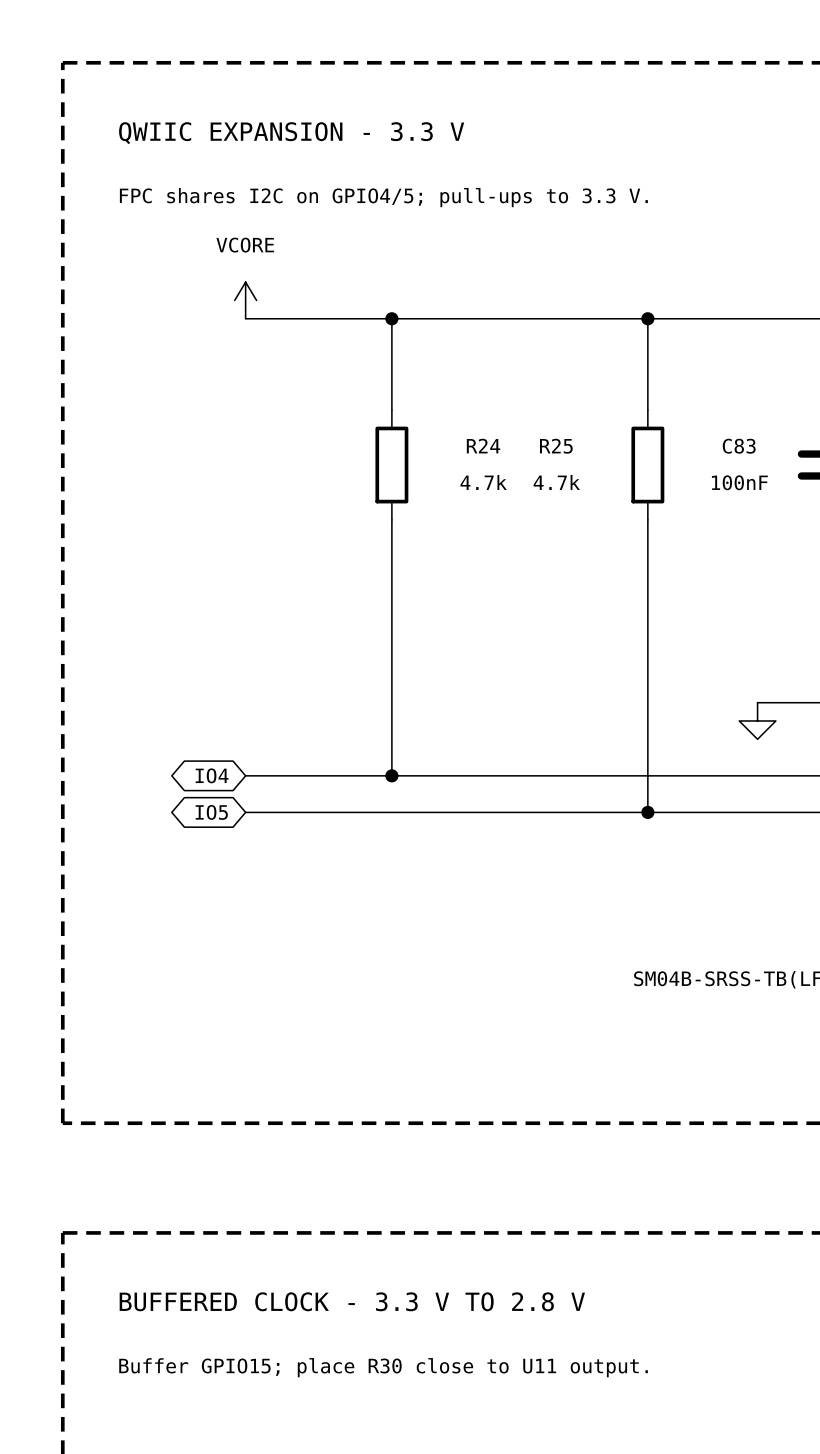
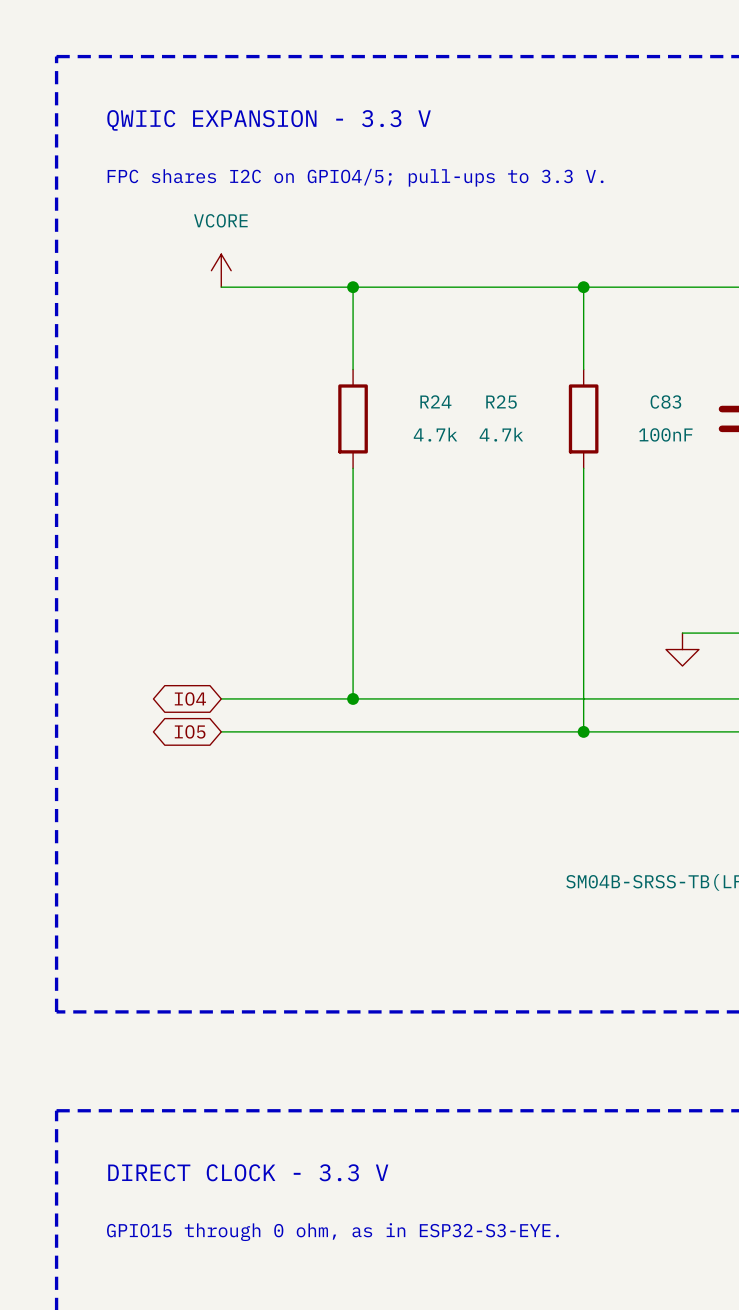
text: BUFFERED CLOCK - 3.3 V TO 2.8 V (352, 1301) -> DIRECT CLOCK - 3.3 V (248, 1172)
text: Buffer GPIO15; place R30 close to U11 output. (383, 1367) -> GPIO15 through 0 ohm, as in ESP32-S3-EYE. (332, 1232)

